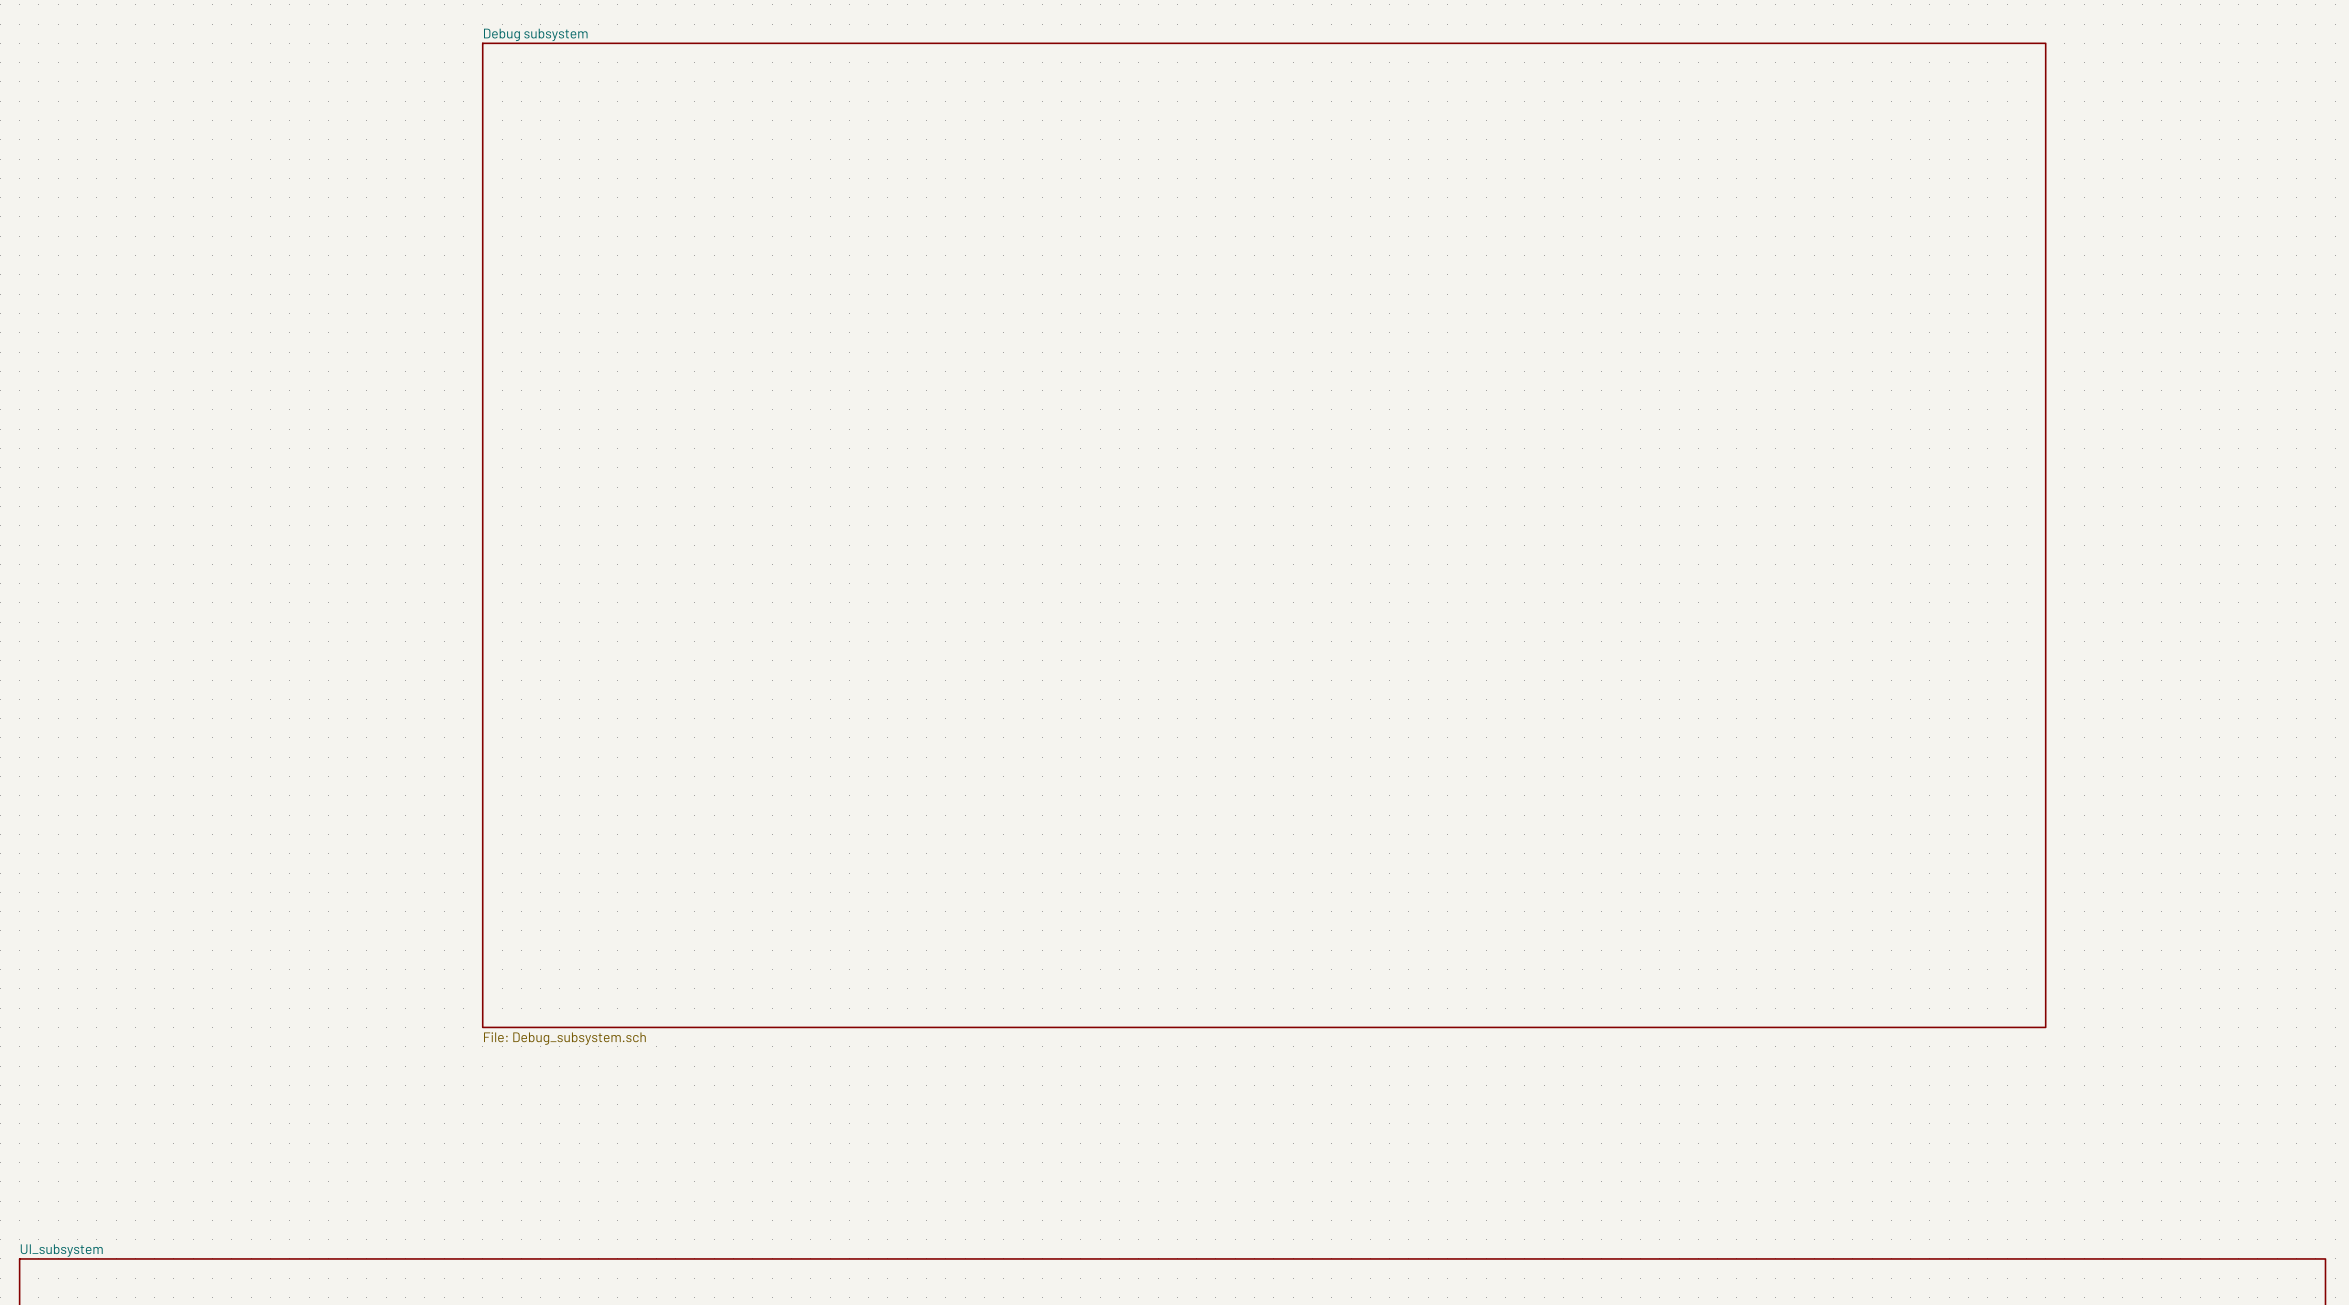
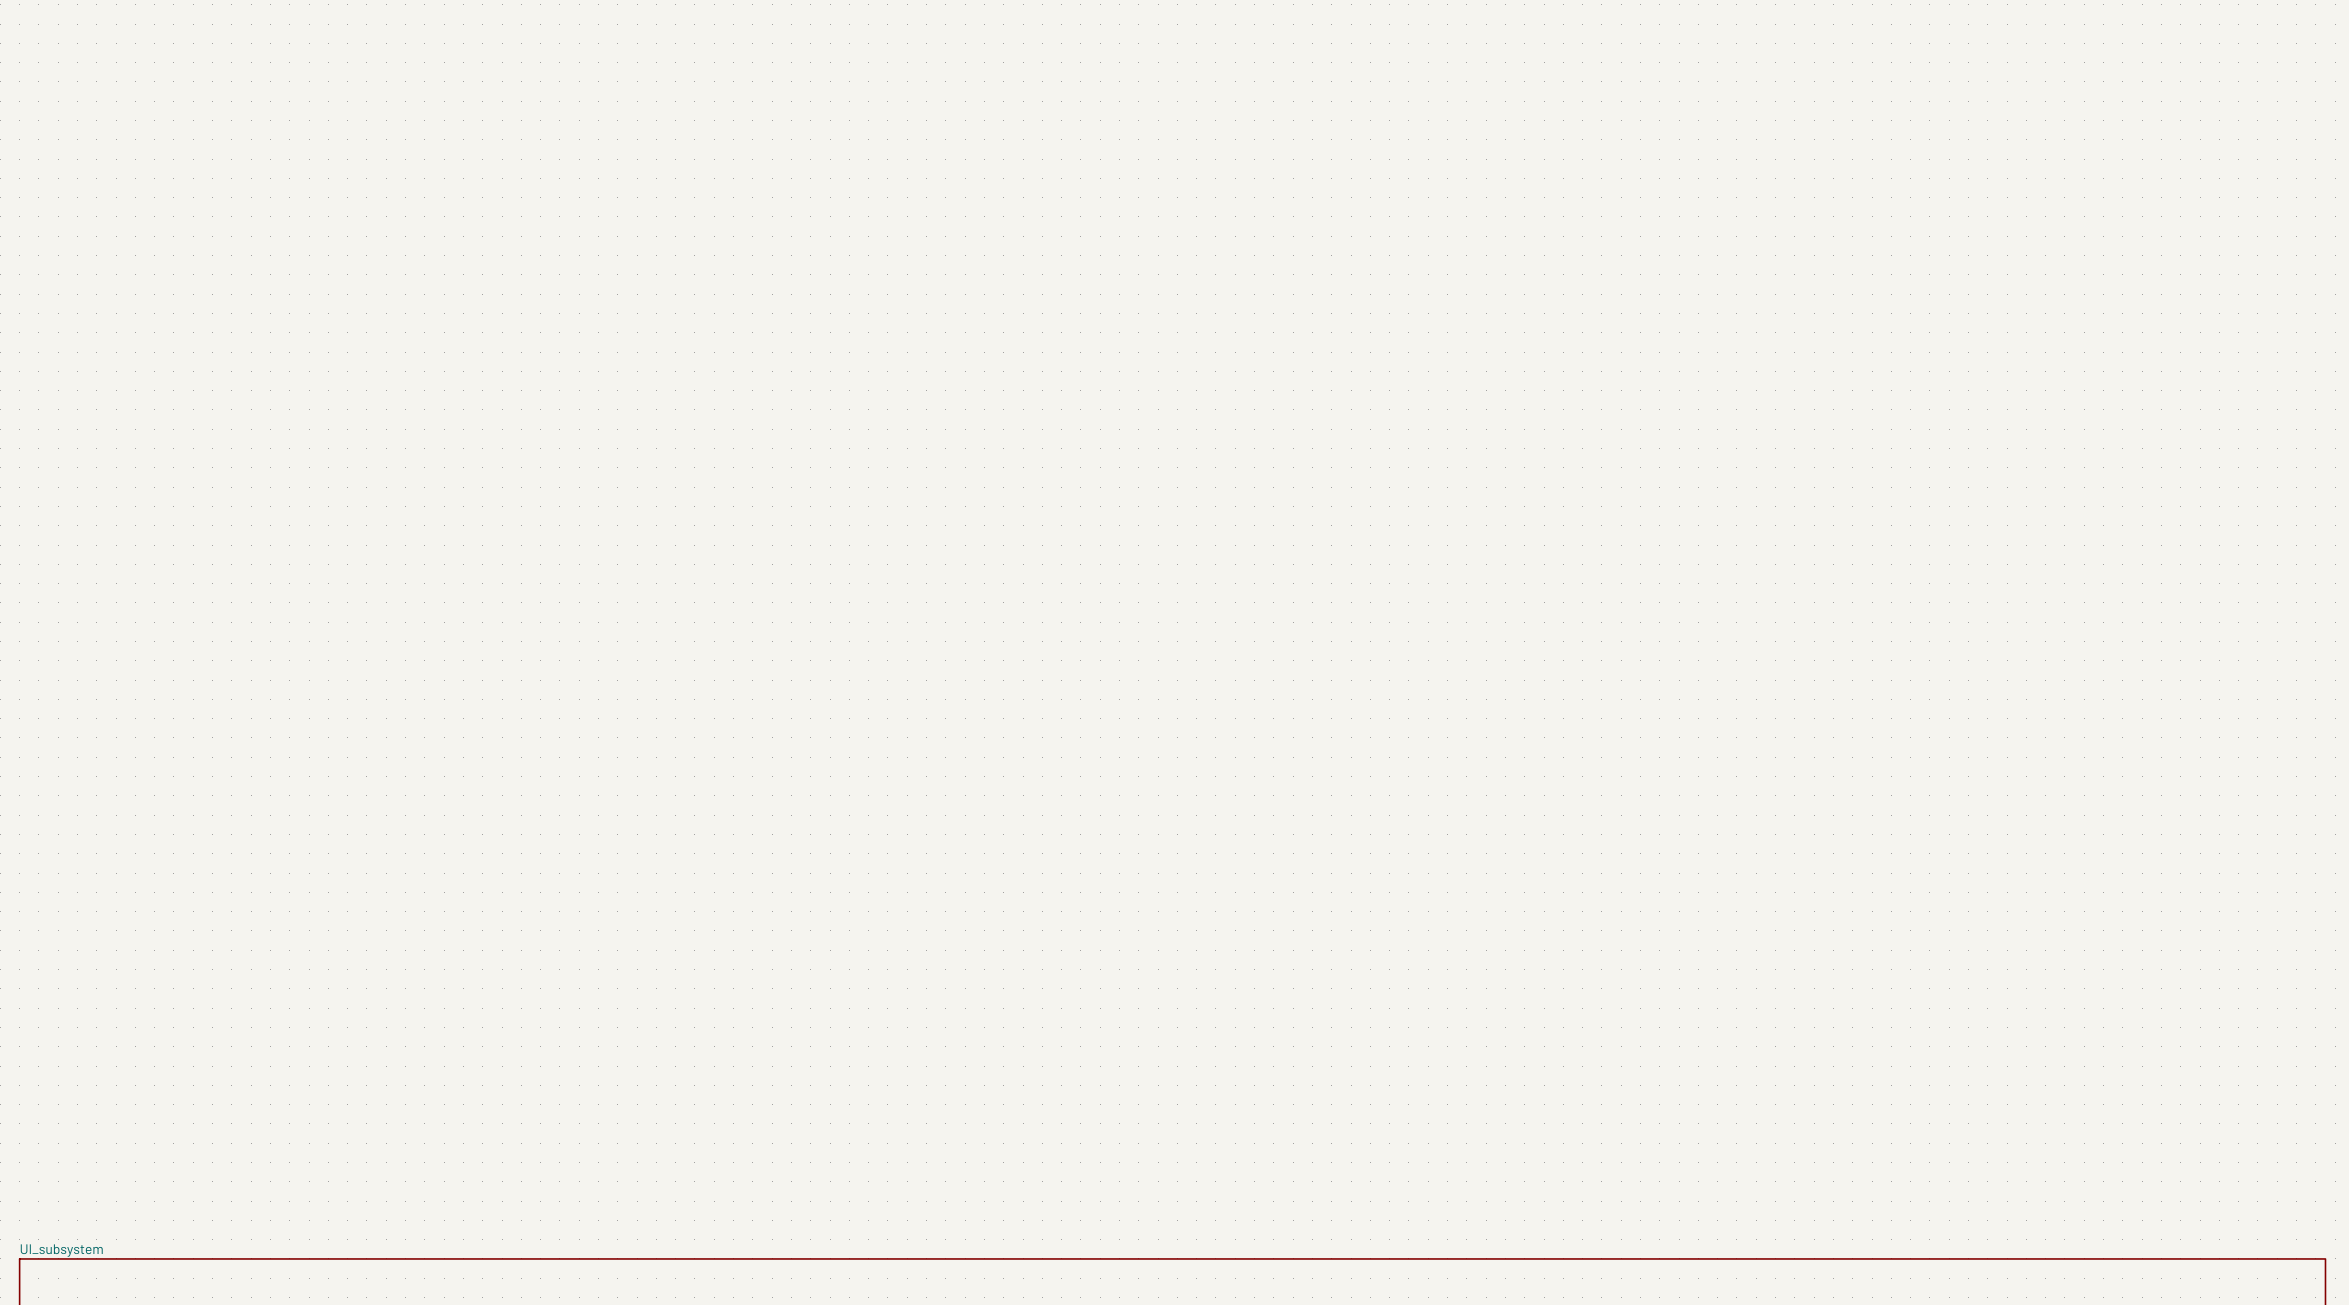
sheet Debug subsystem: File: Debug_subsystem.sch (1264, 535) -> none

